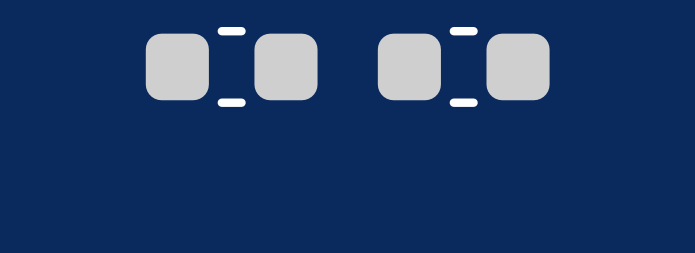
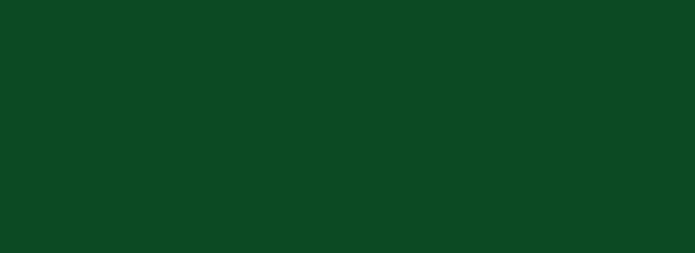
part: (231, 66) -> none
part: (463, 66) -> none

